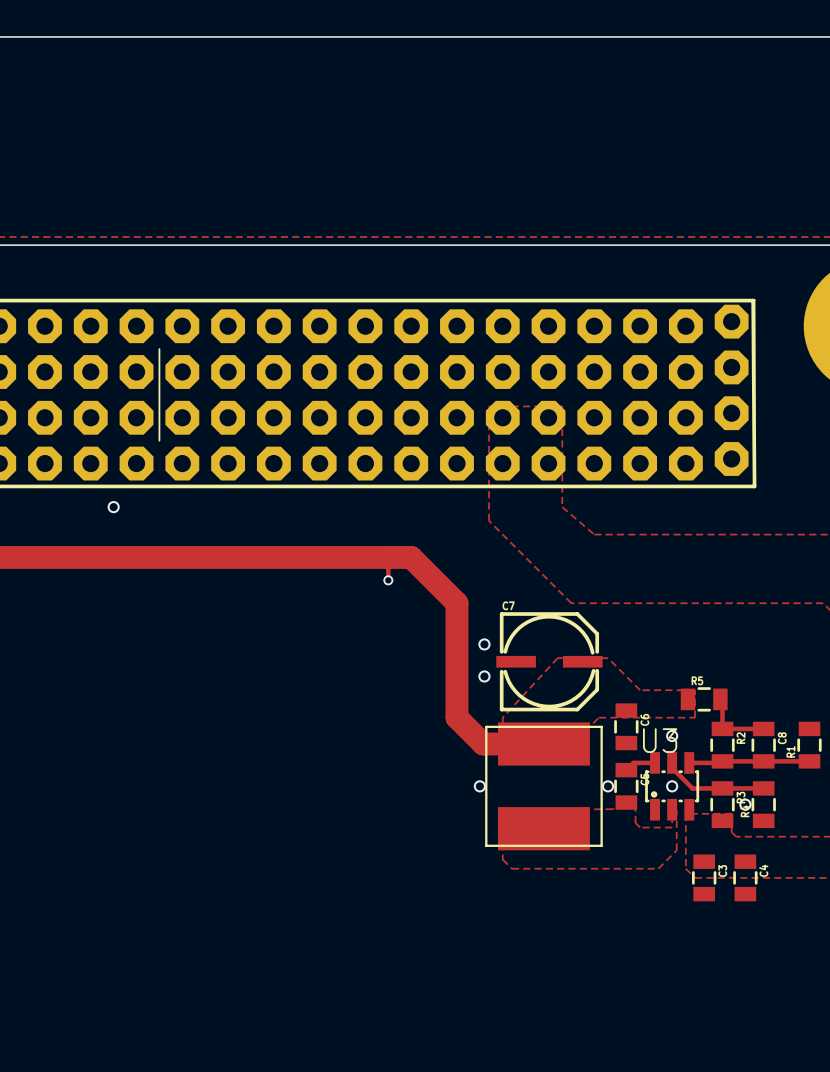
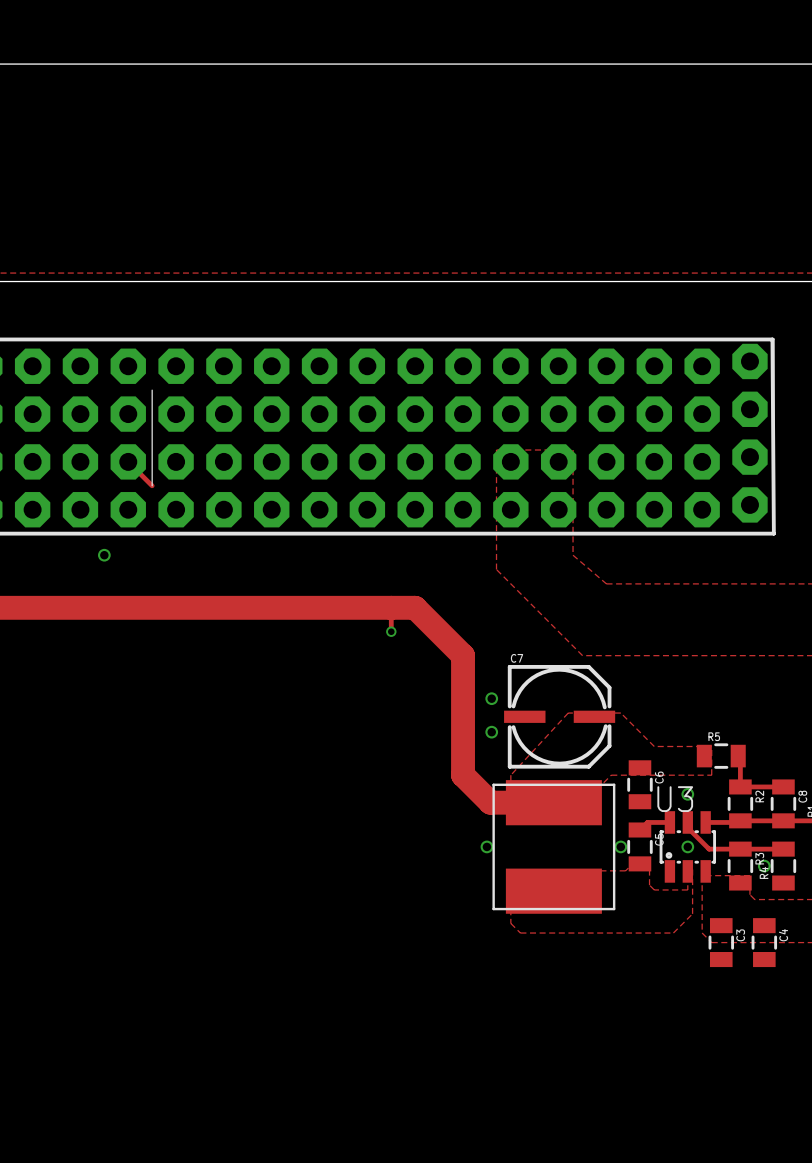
track: none -> (128, 461) (152, 485)

